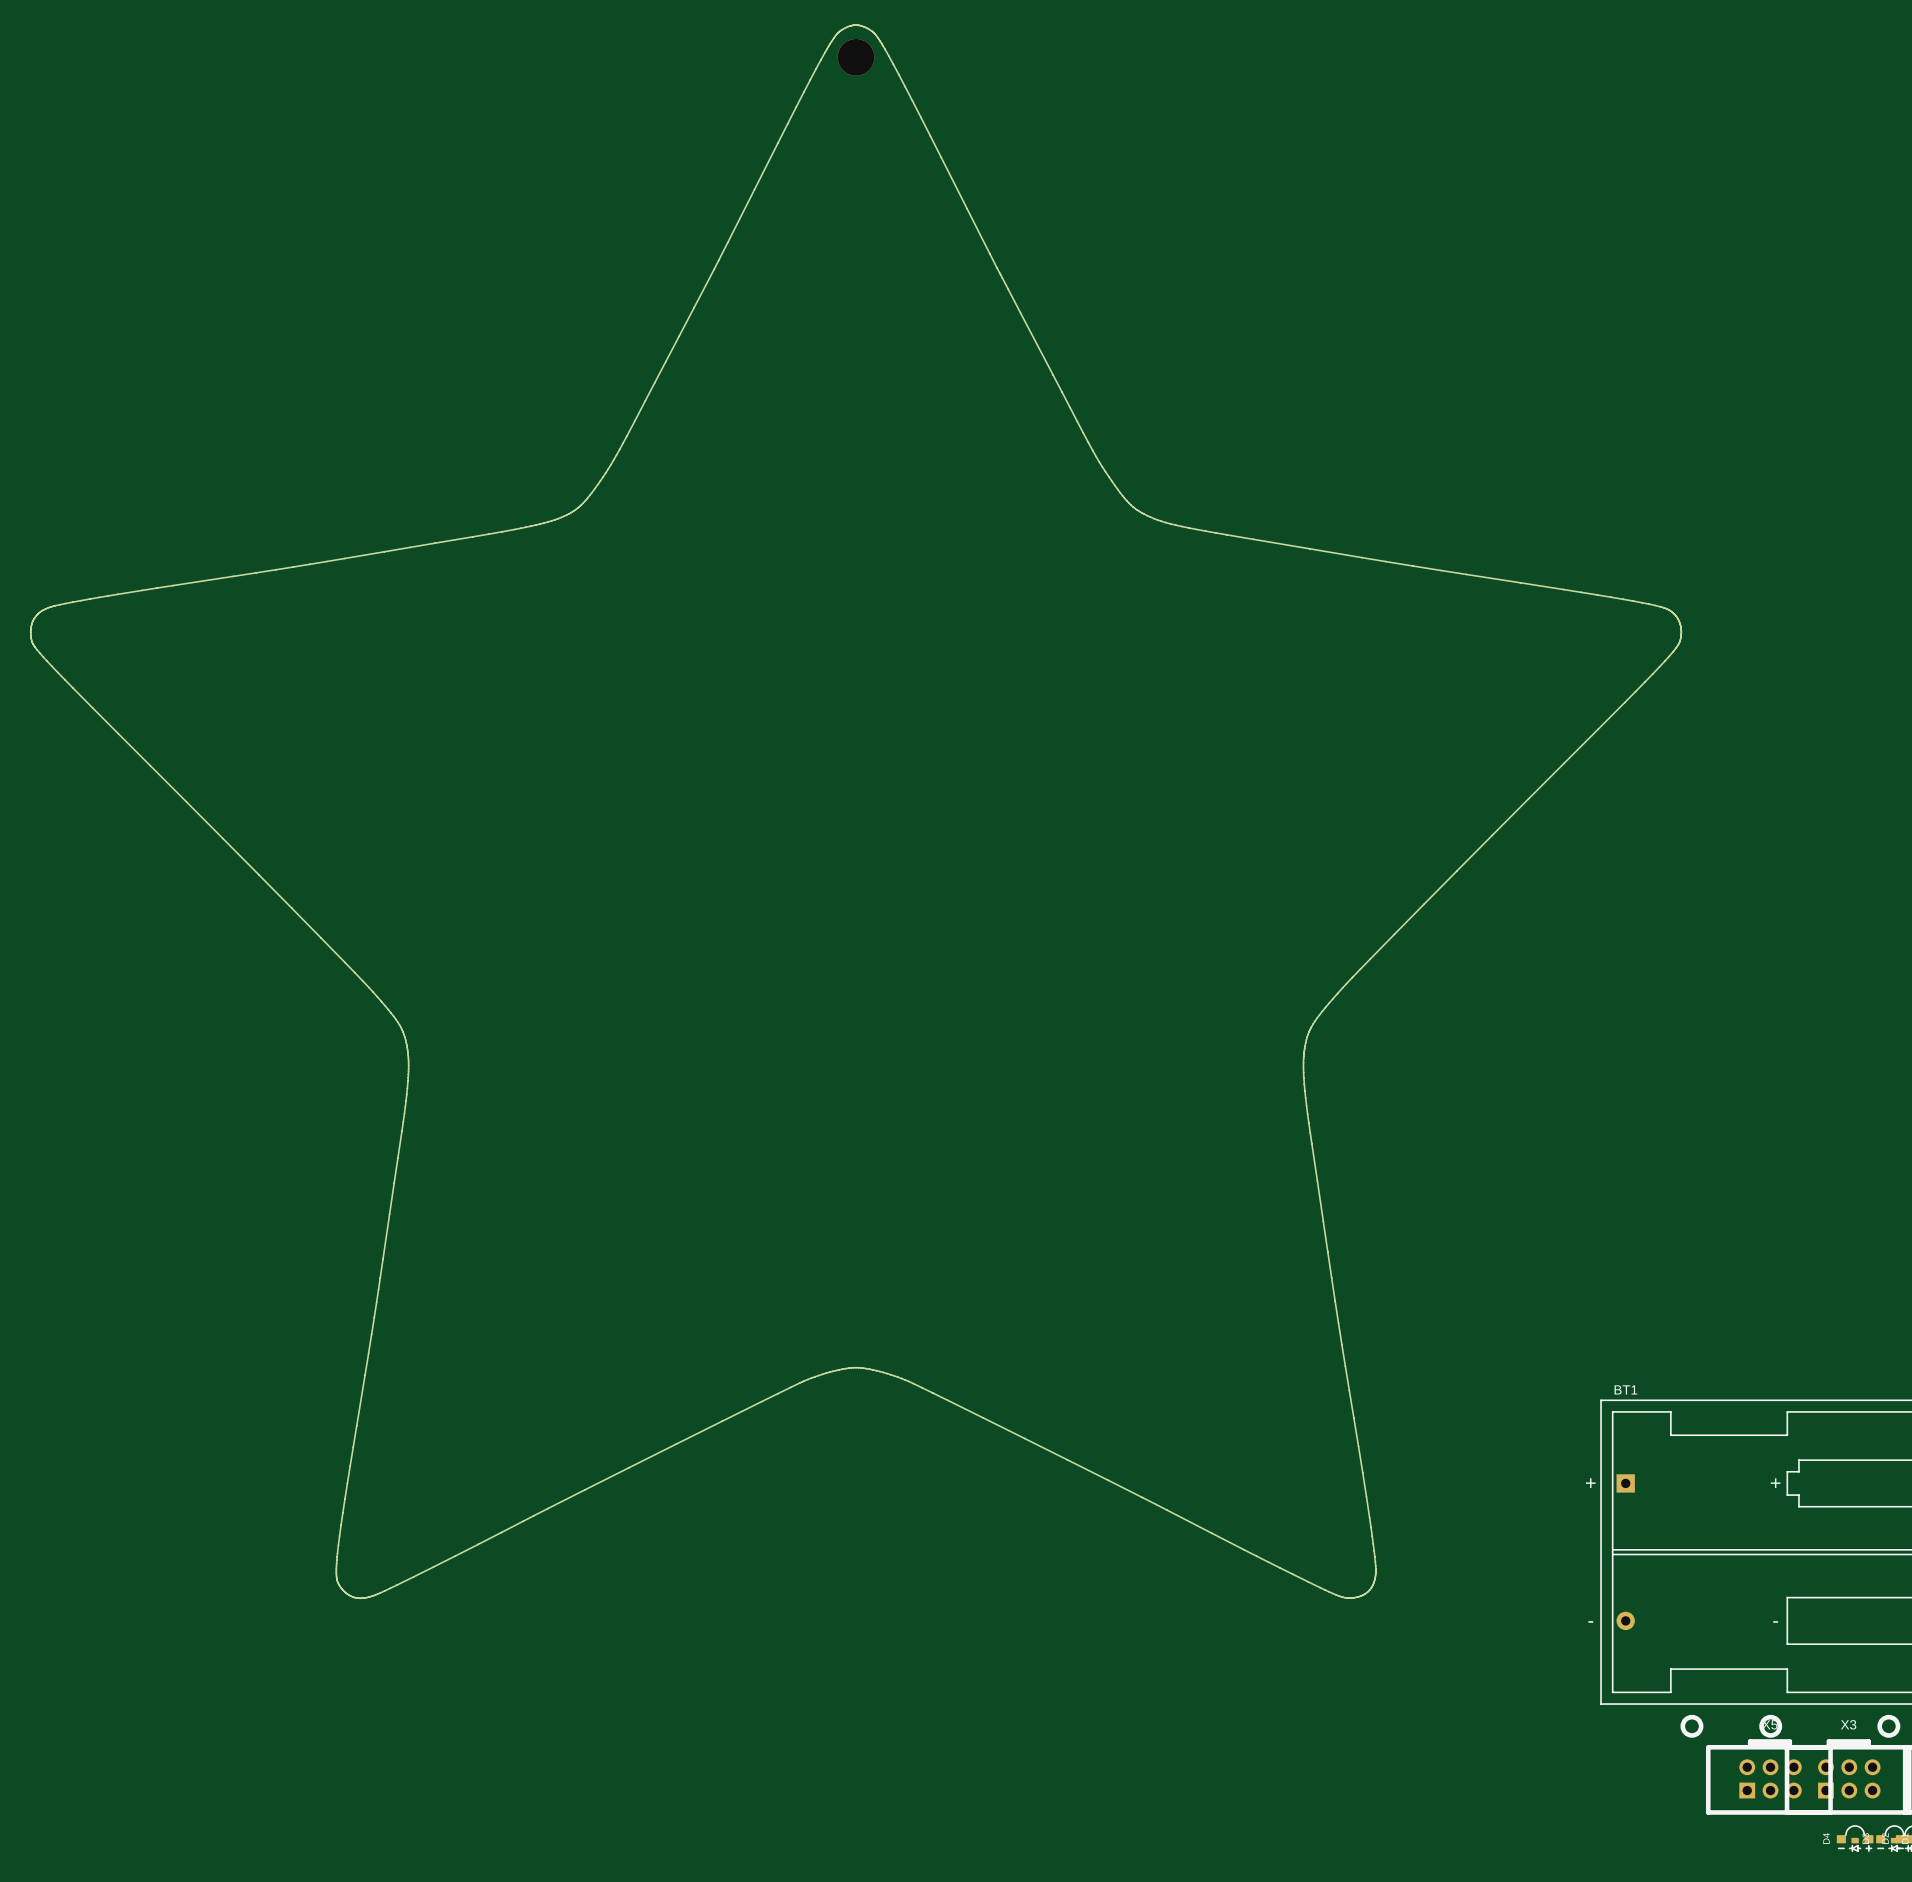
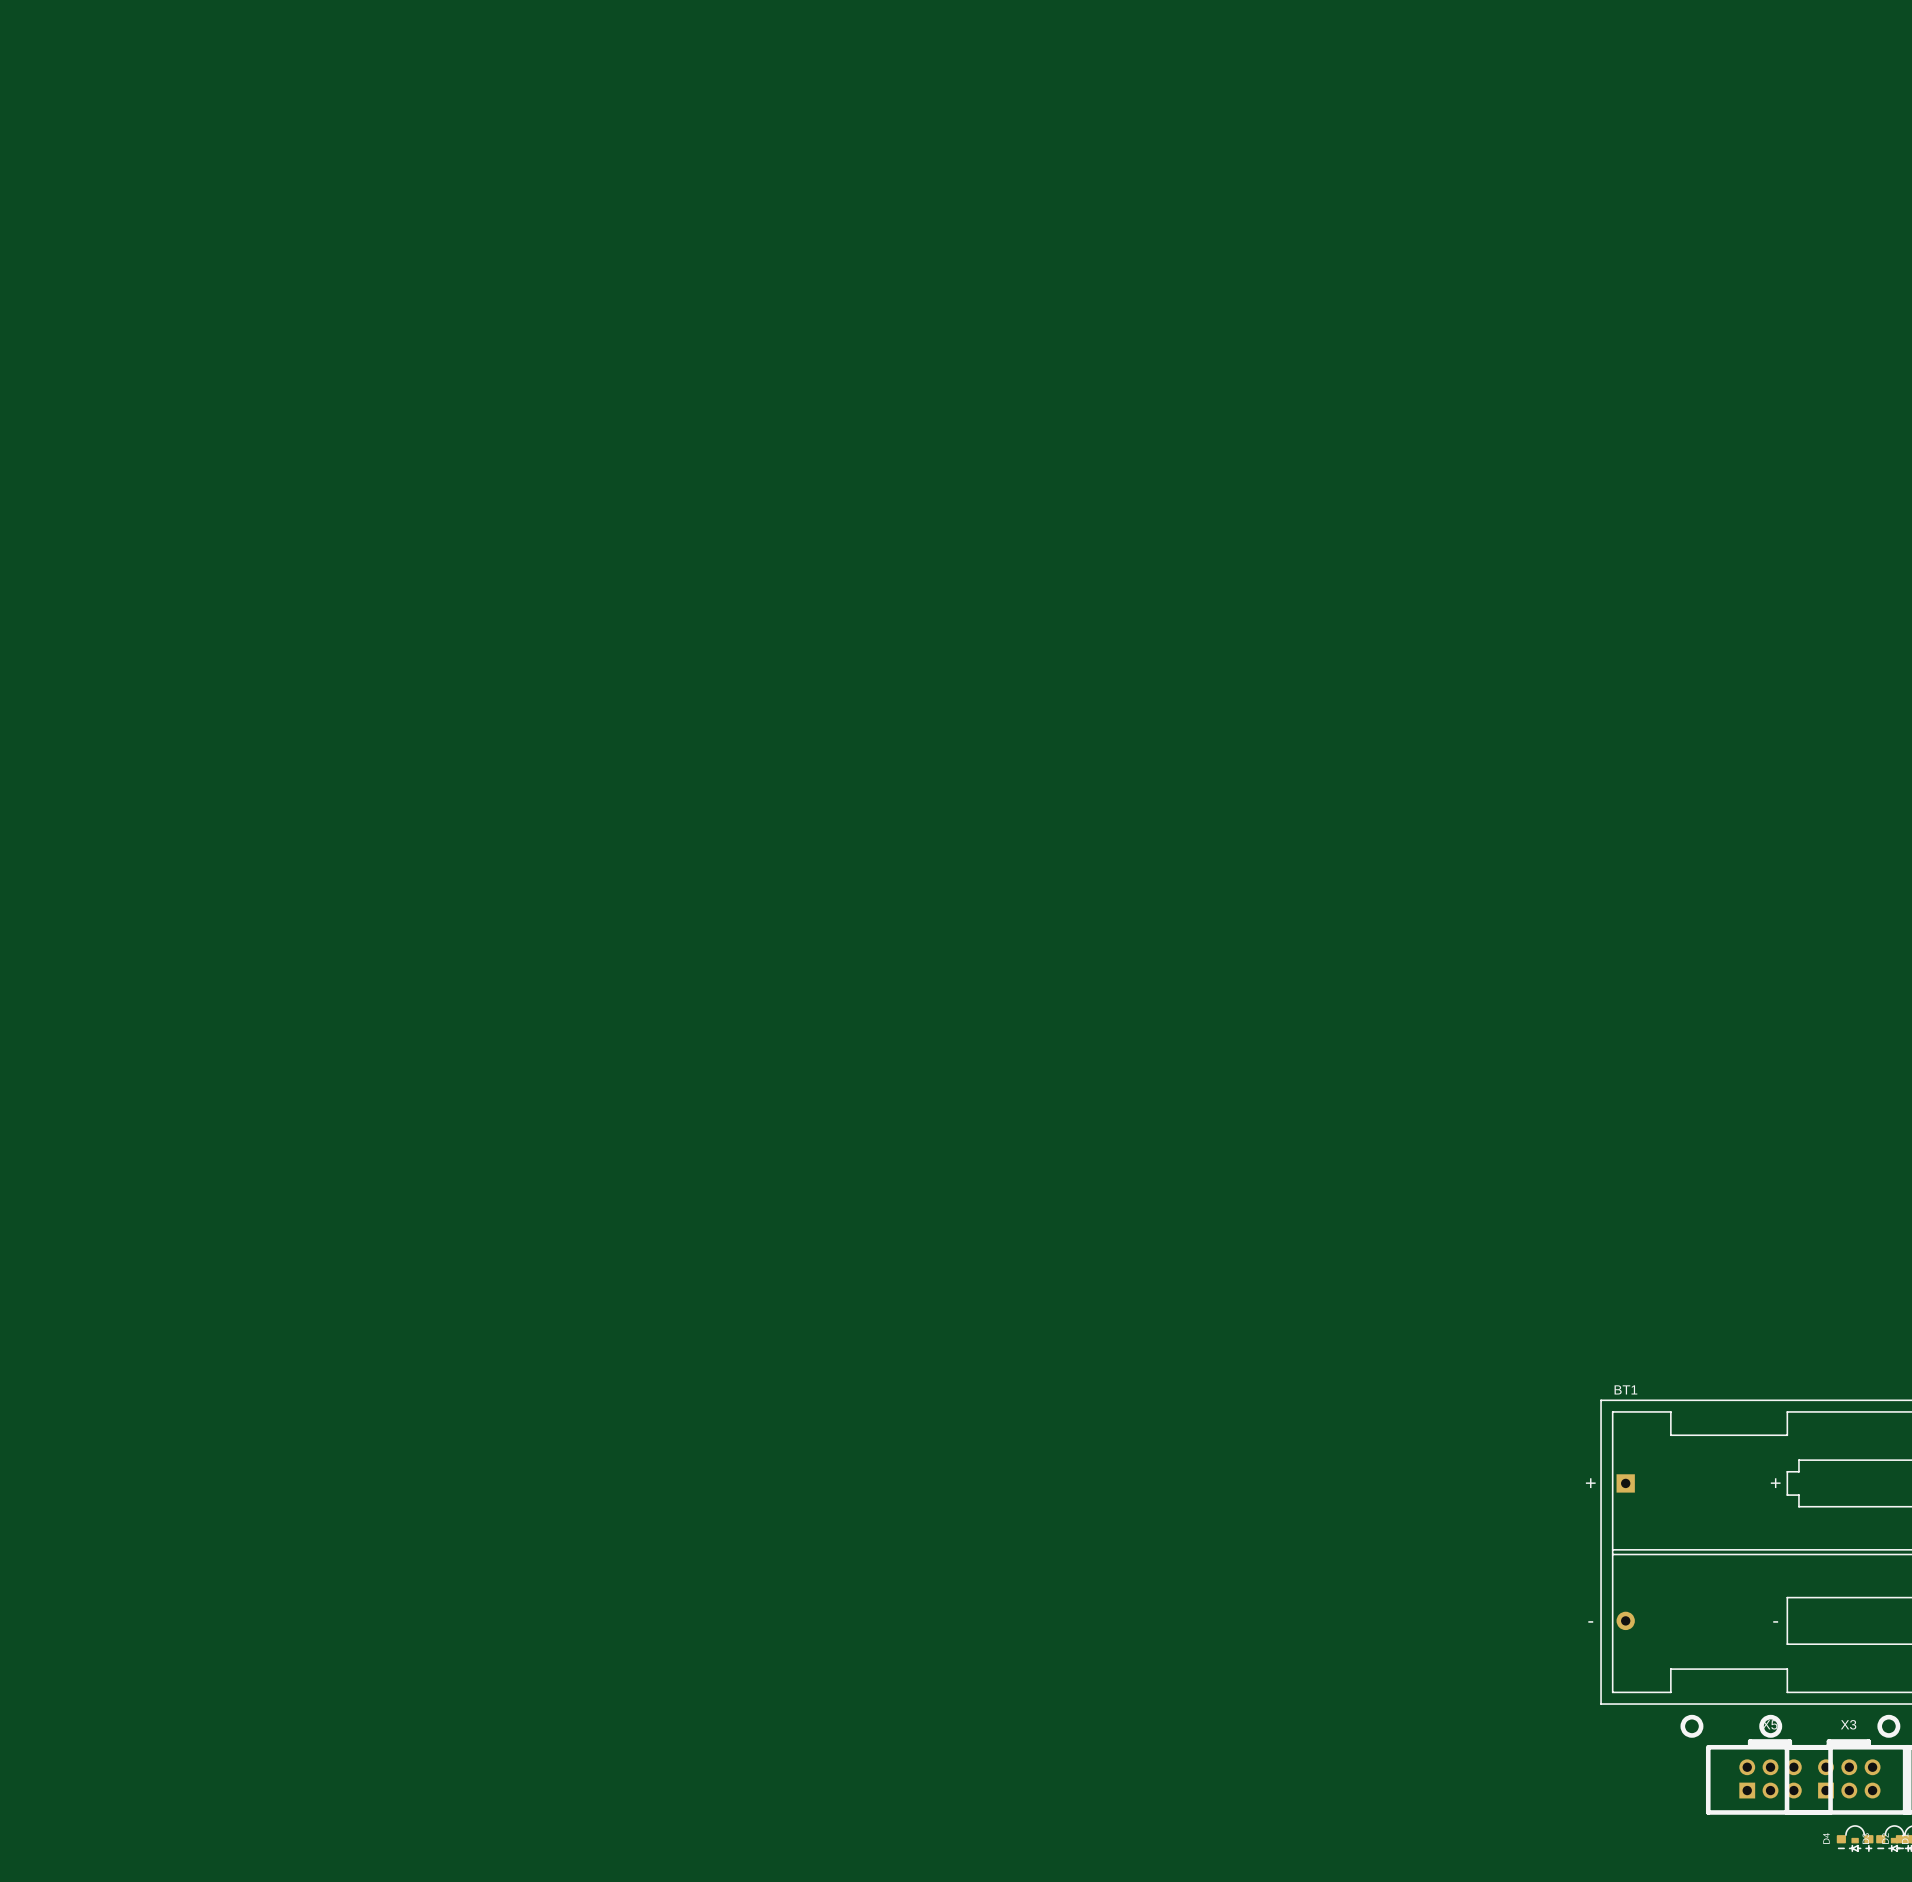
board edge: (855, 25) (872, 31) (884, 49) (1092, 450) (1117, 489) (1135, 508) (1157, 519) (1196, 529) (1655, 605) (1668, 609) (1677, 617) (1681, 628) (1679, 641) (1672, 652) (1644, 682) (1346, 983) (1319, 1014) (1307, 1034) (1303, 1067) (1307, 1113) (1374, 1556) (1374, 1579) (1366, 1593) (1349, 1598) (1332, 1593) (913, 1383) (883, 1372) (856, 1367) (832, 1371) (802, 1381) (390, 1588) (368, 1597) (354, 1597) (344, 1591) (337, 1582) (337, 1557) (405, 1106) (408, 1062) (404, 1034) (393, 1016) (362, 980) (43, 656) (31, 641) (32, 623) (41, 611) (59, 604) (502, 531) (551, 520) (575, 509) (597, 484) (623, 443) (826, 49) (839, 31) (855, 25) -> none
part: (856, 57) -> none

